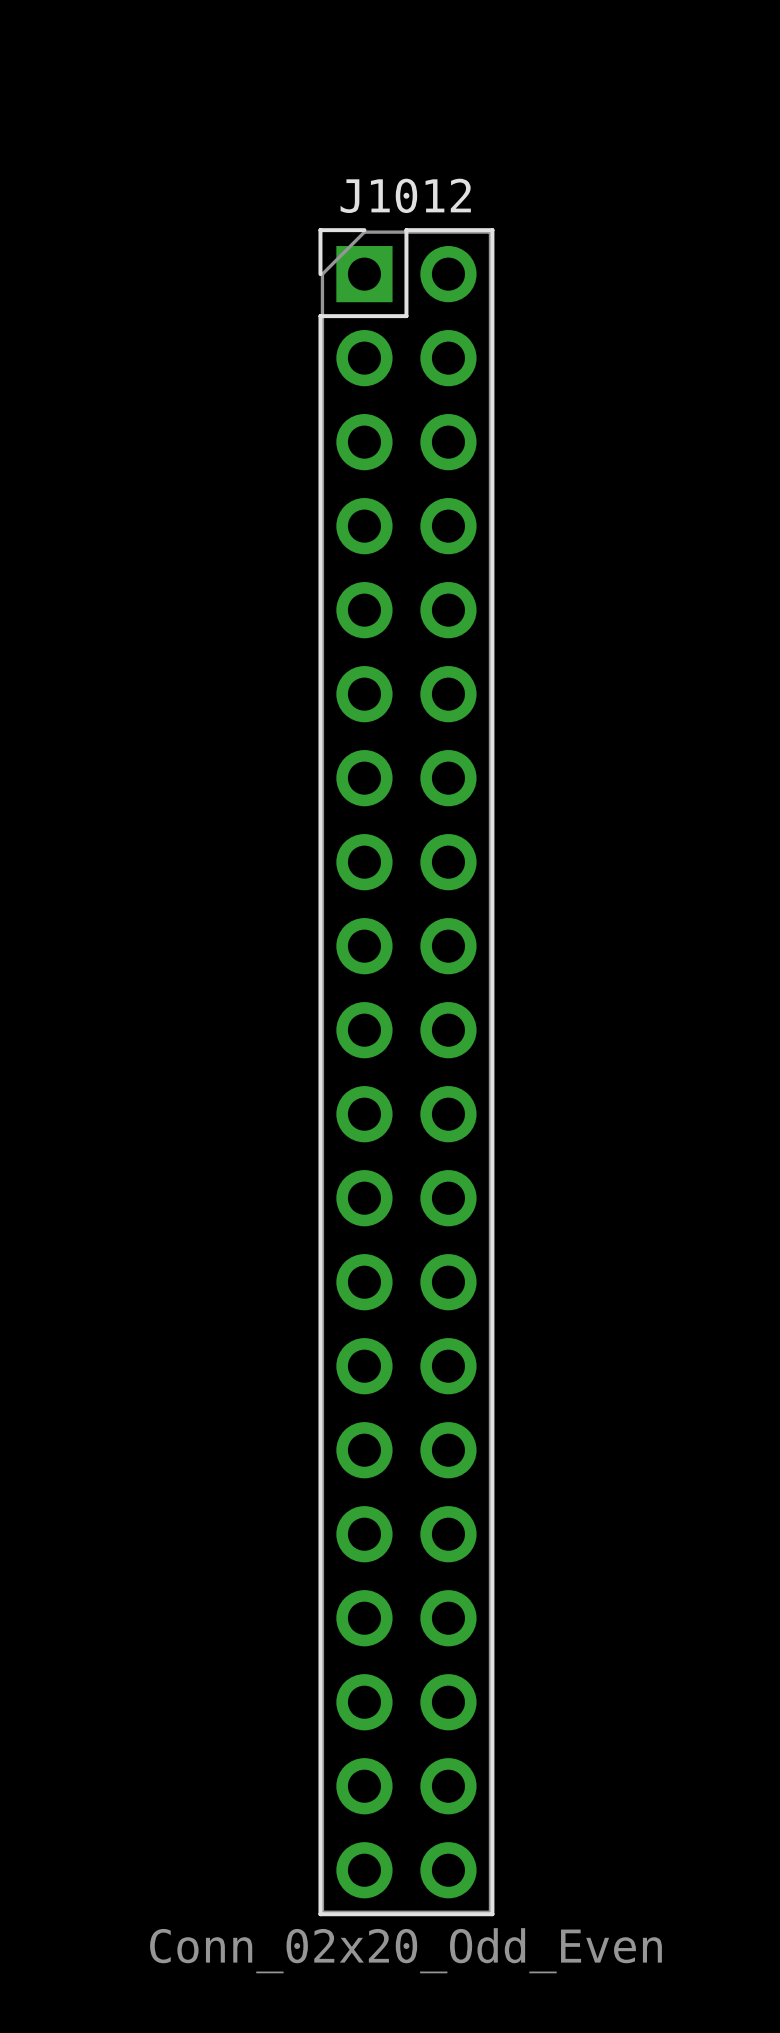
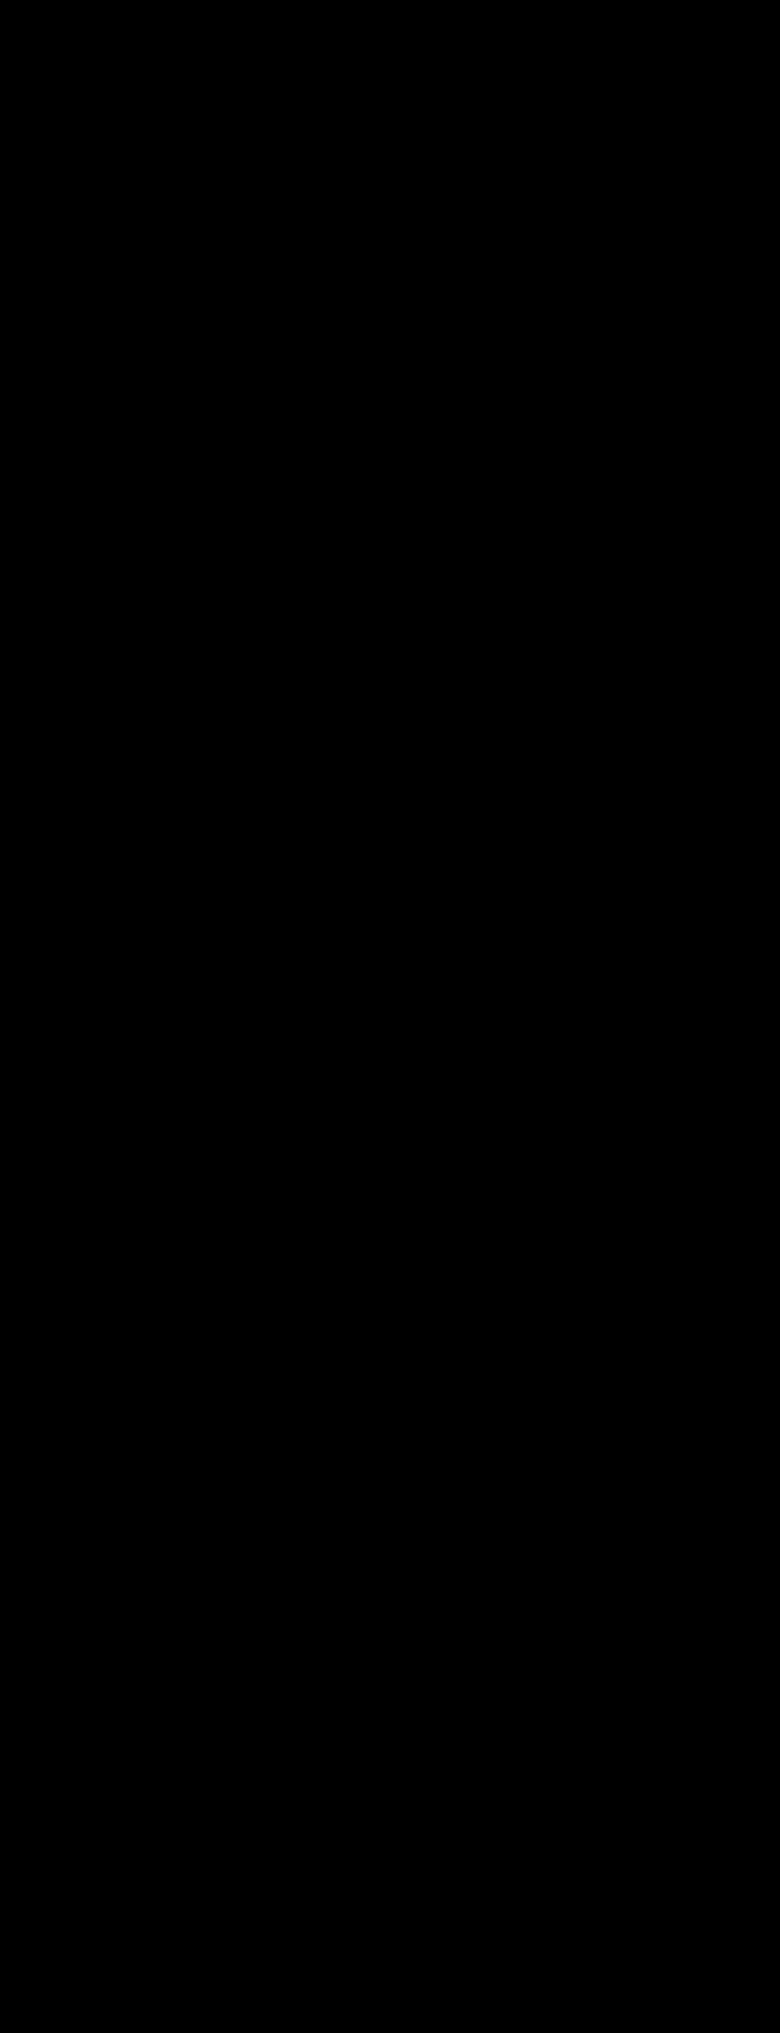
J1012: Conn_02x20_Odd_Even (406, 1072) -> none

